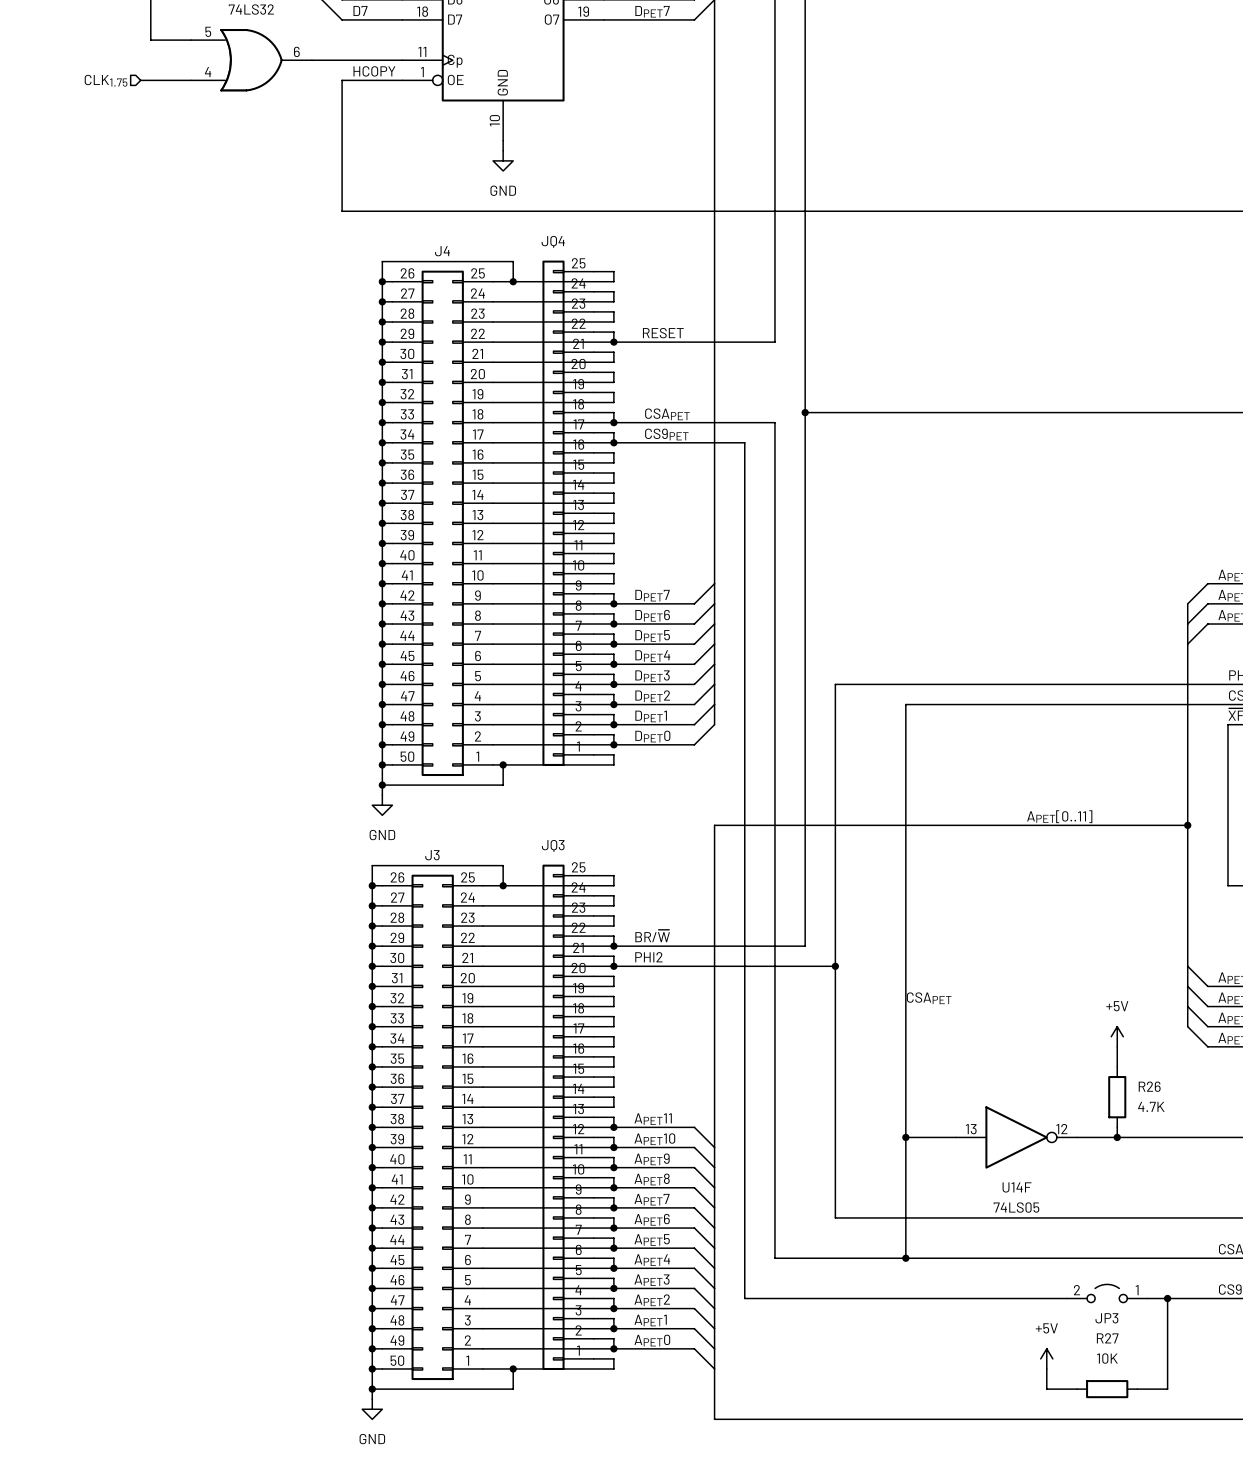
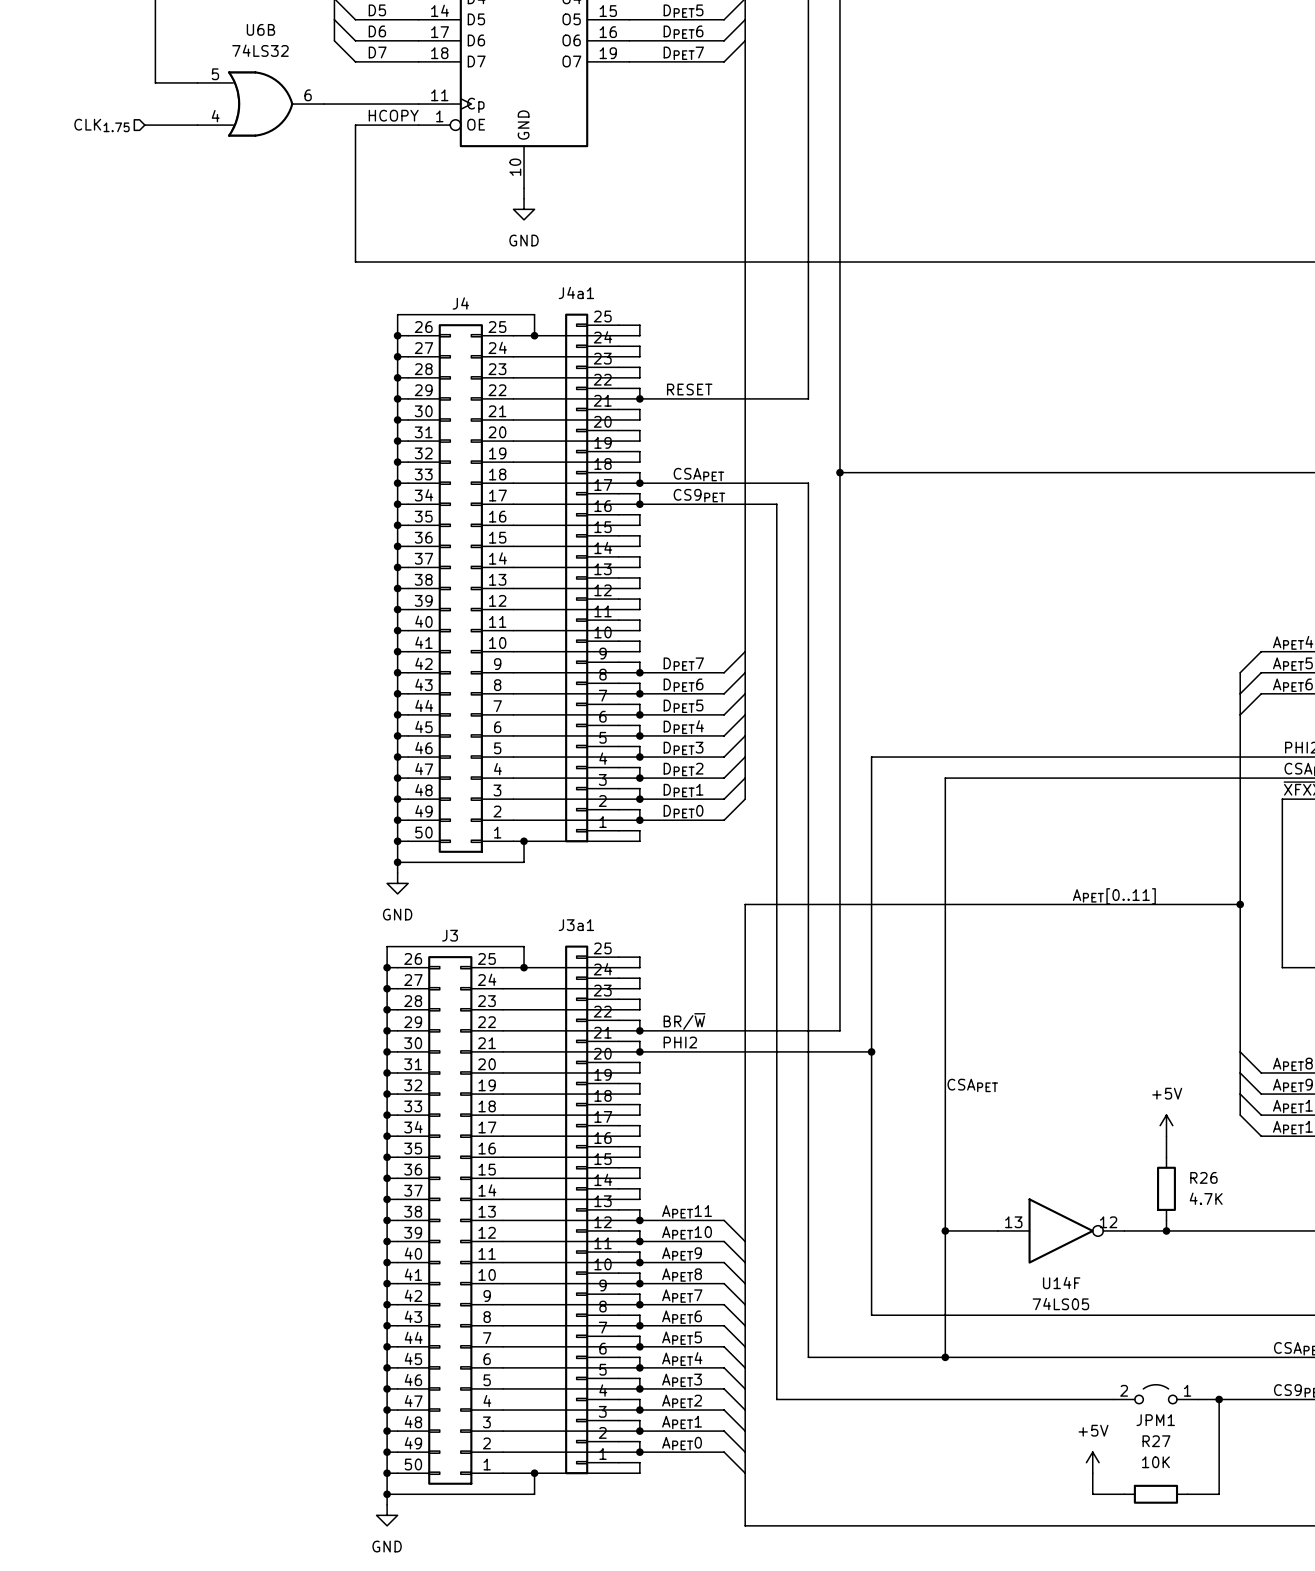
JQ4 name: JQ4 (553, 241) -> J4a1 (576, 292)
JQ3 name: JQ3 (553, 845) -> J3a1 (576, 925)
JP3 name: JP3 (1106, 1318) -> JPM1 (1155, 1420)

